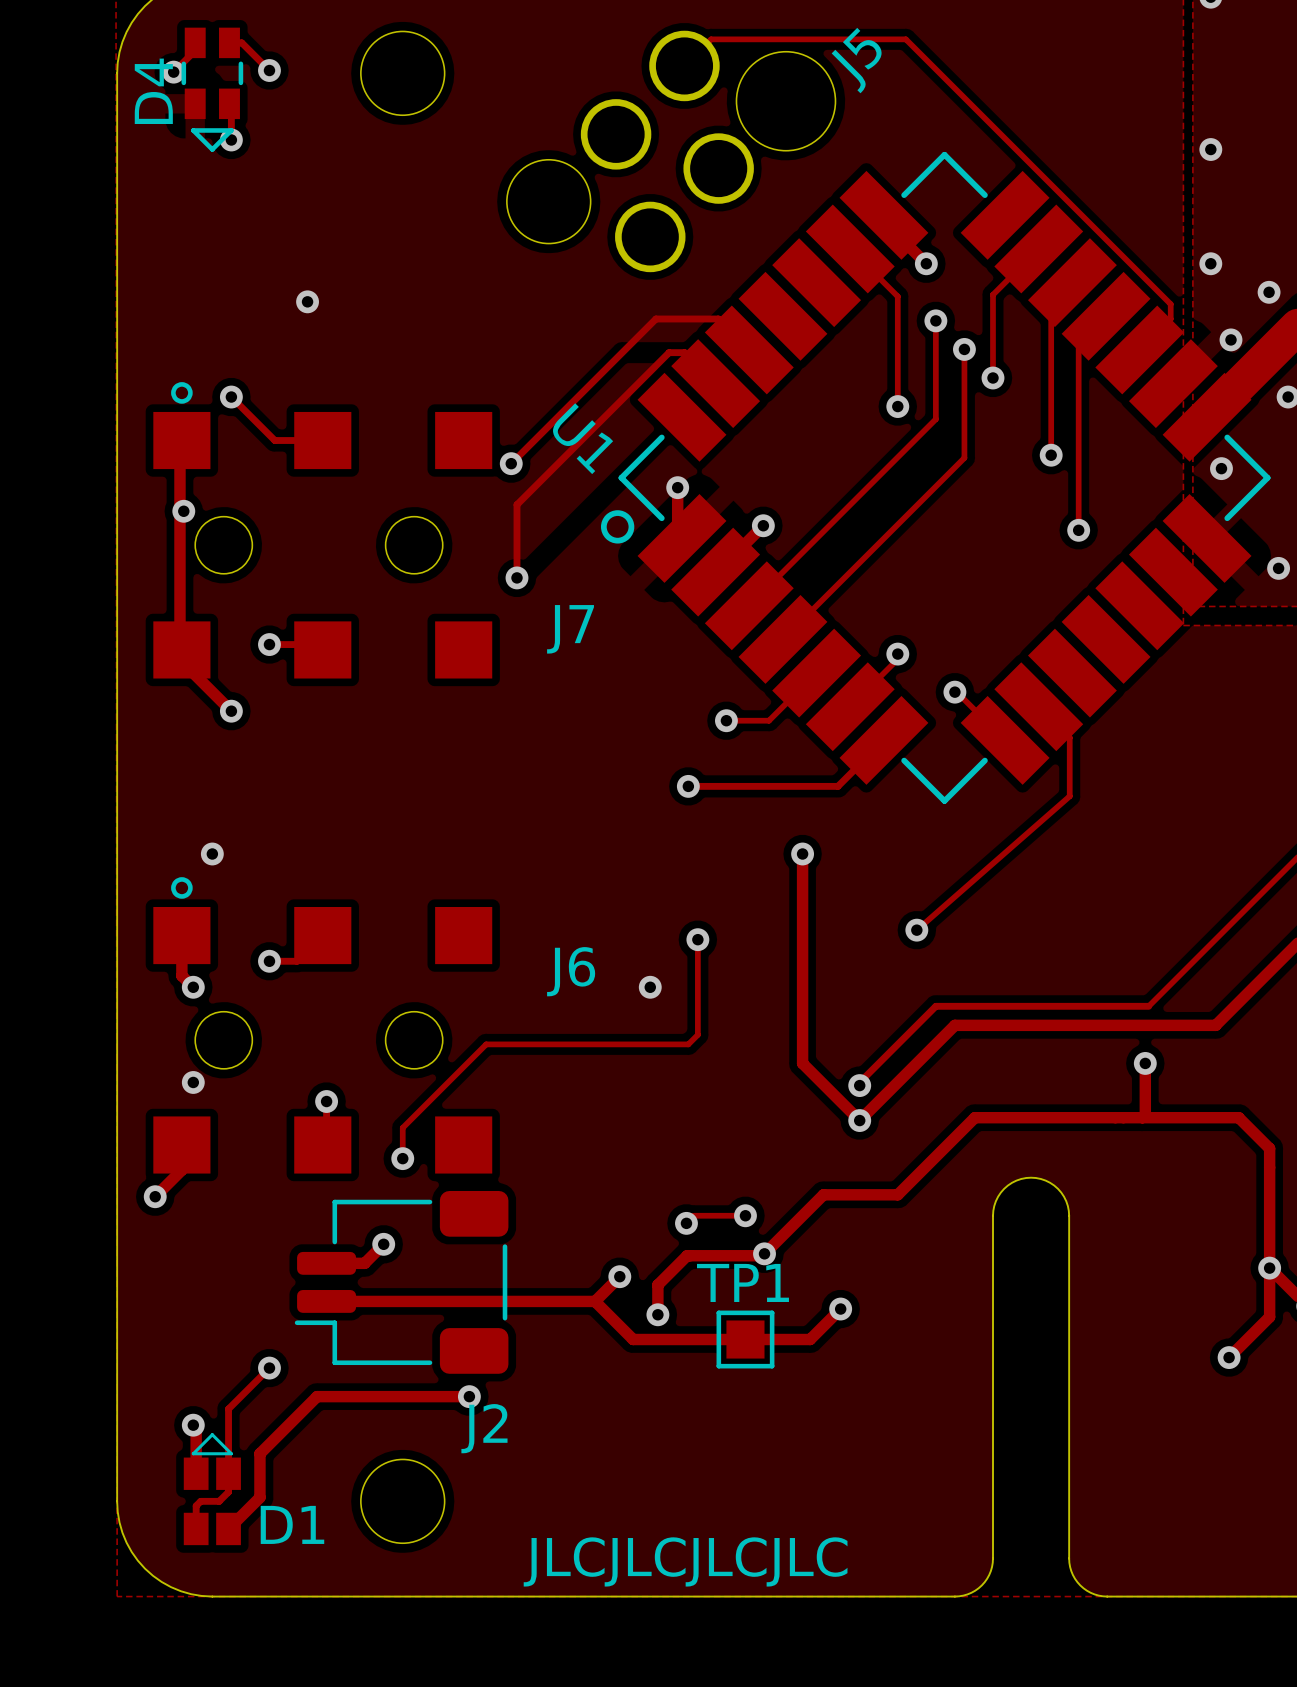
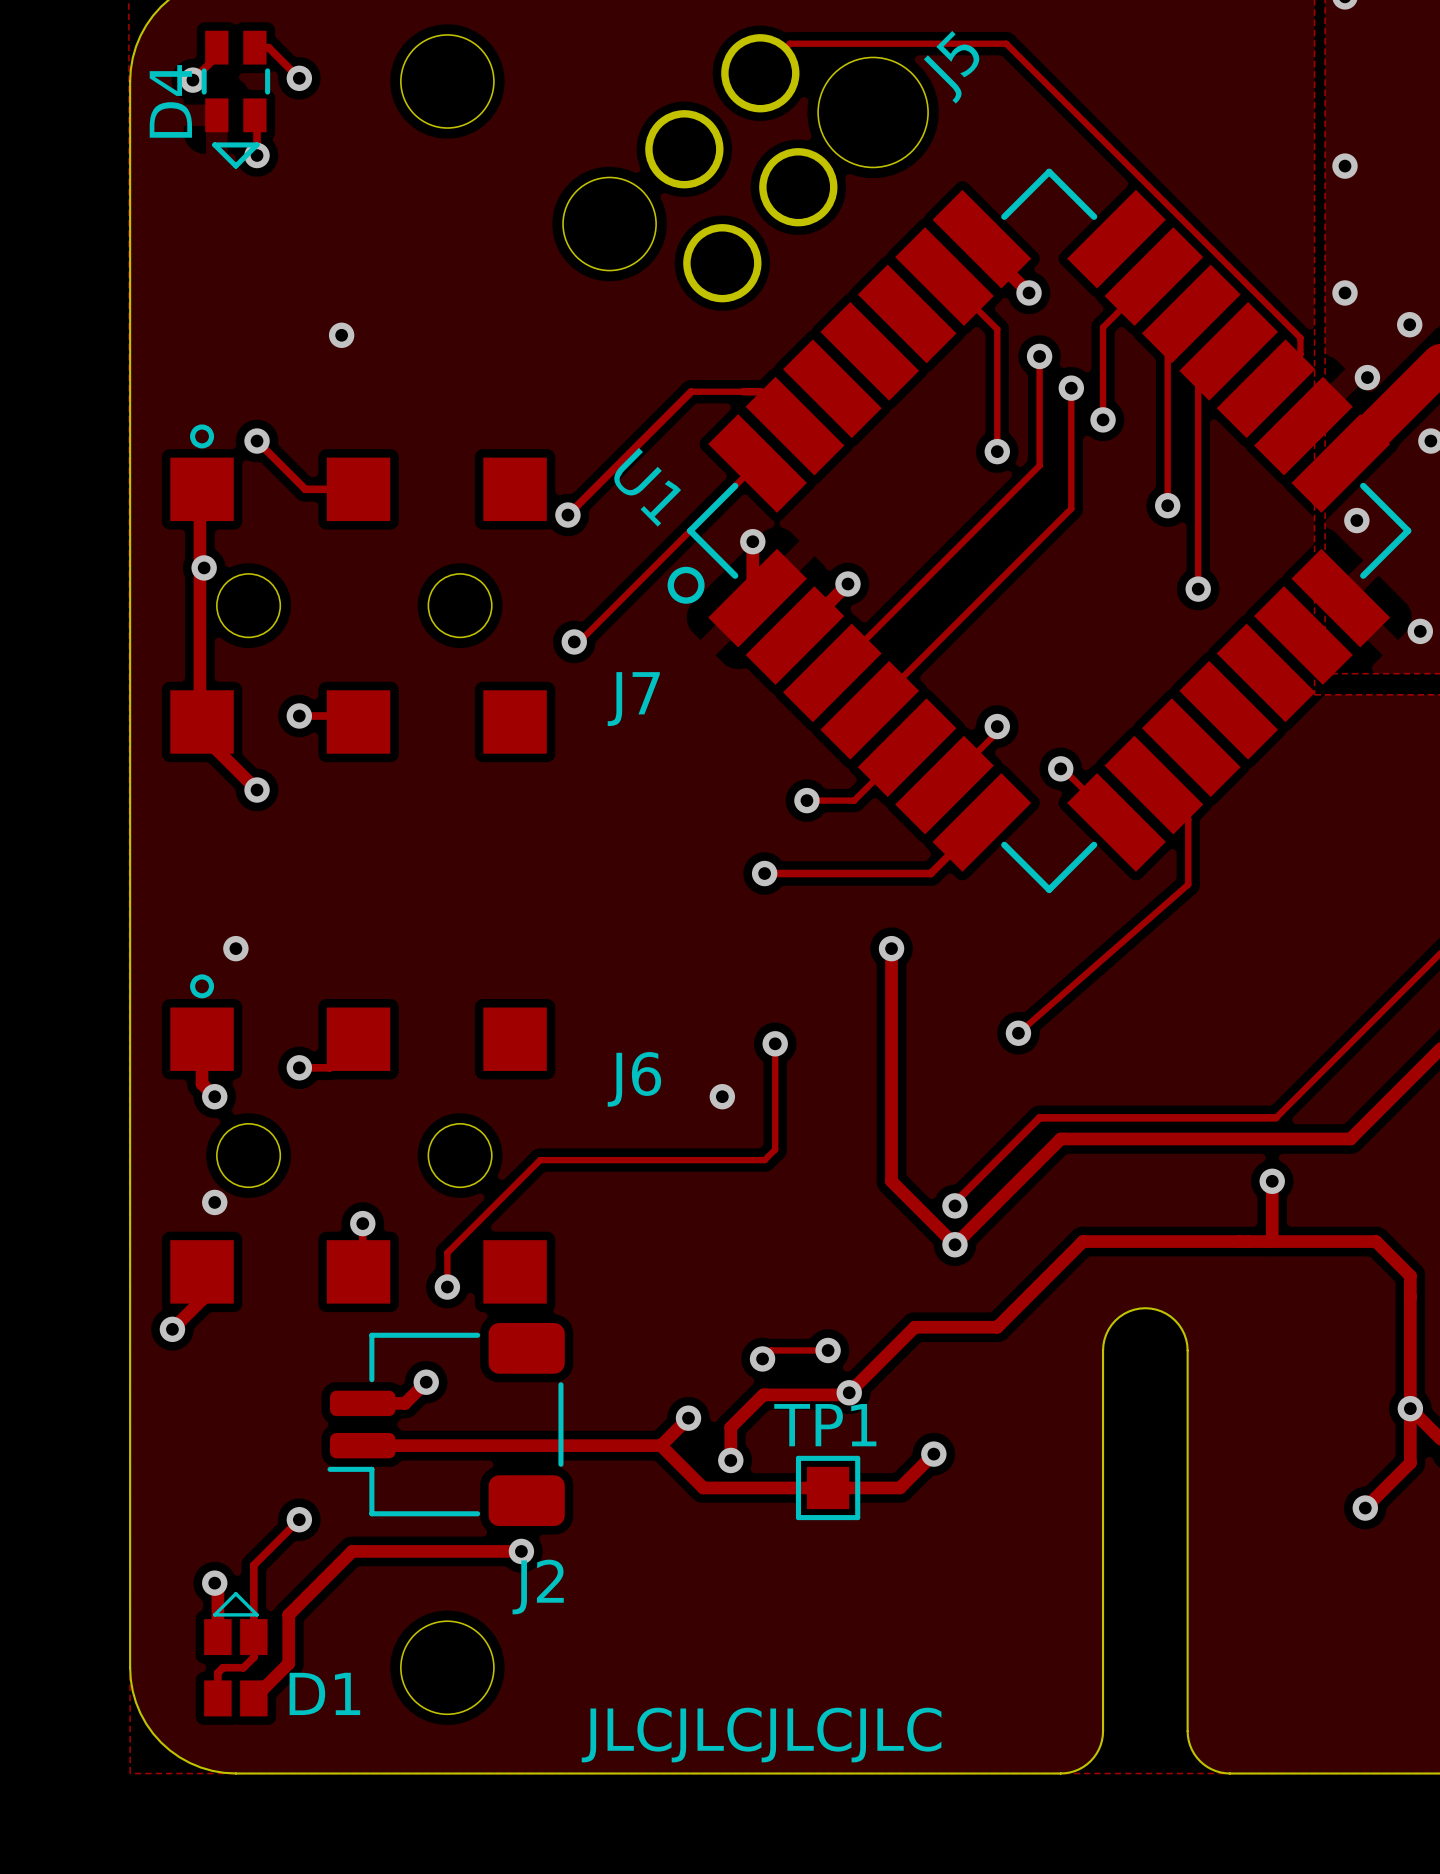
track: (749, 349) (718, 318) (655, 318) (622, 352) -> (743, 391) (691, 391)
track: (669, 352) (516, 504) (516, 577) -> (757, 463) (579, 641) (574, 641)

